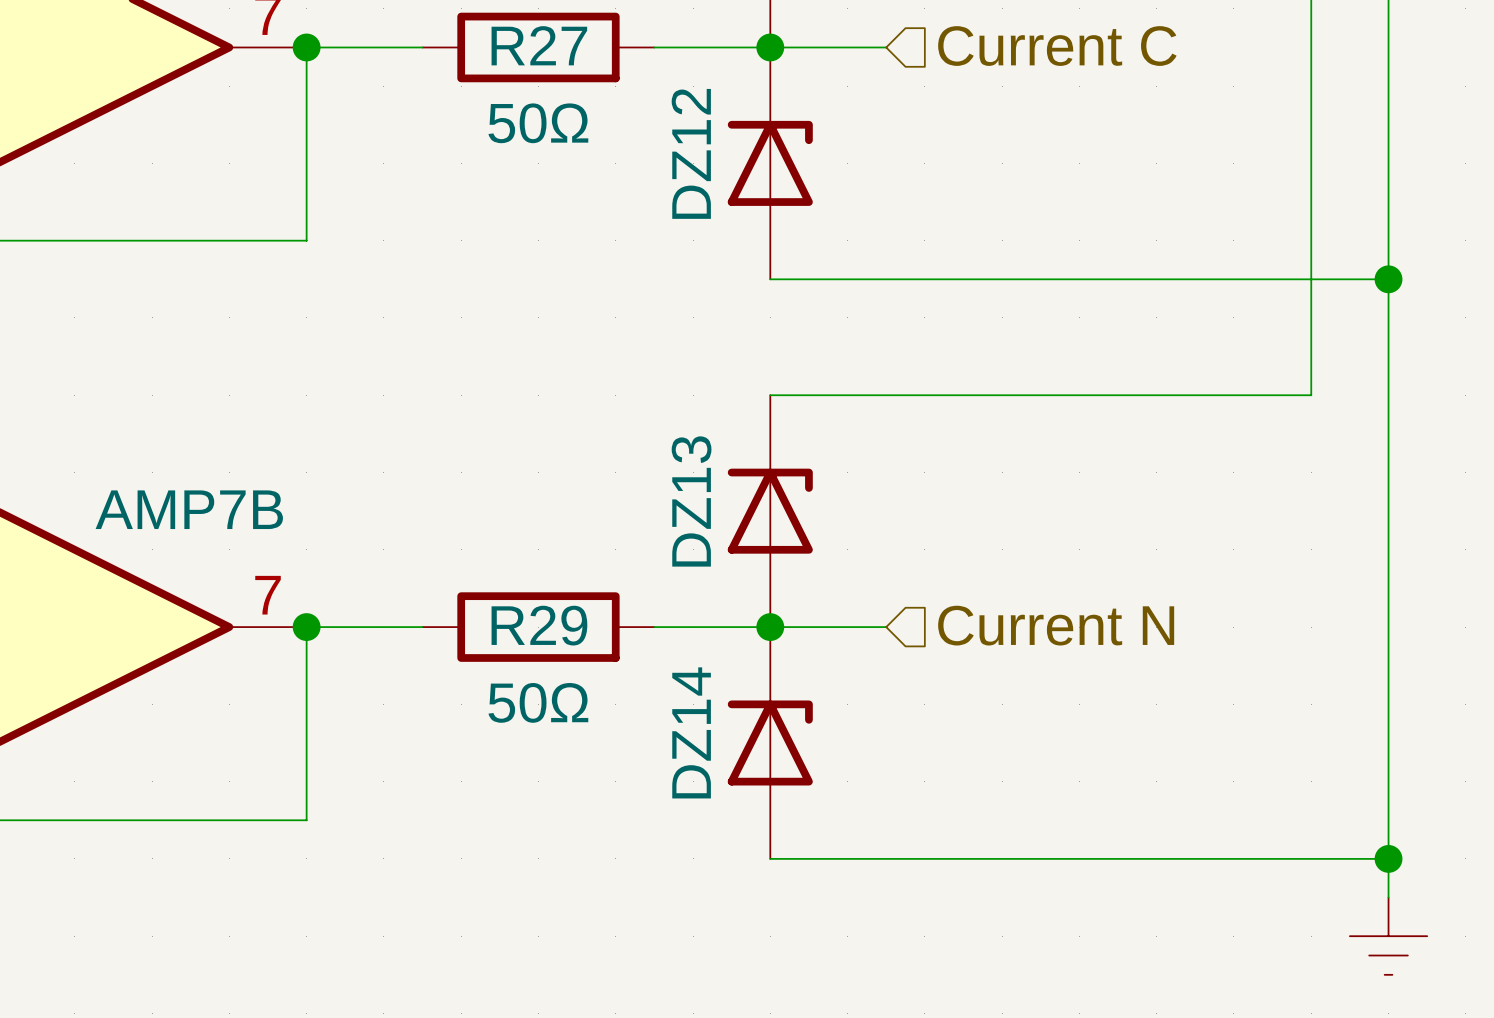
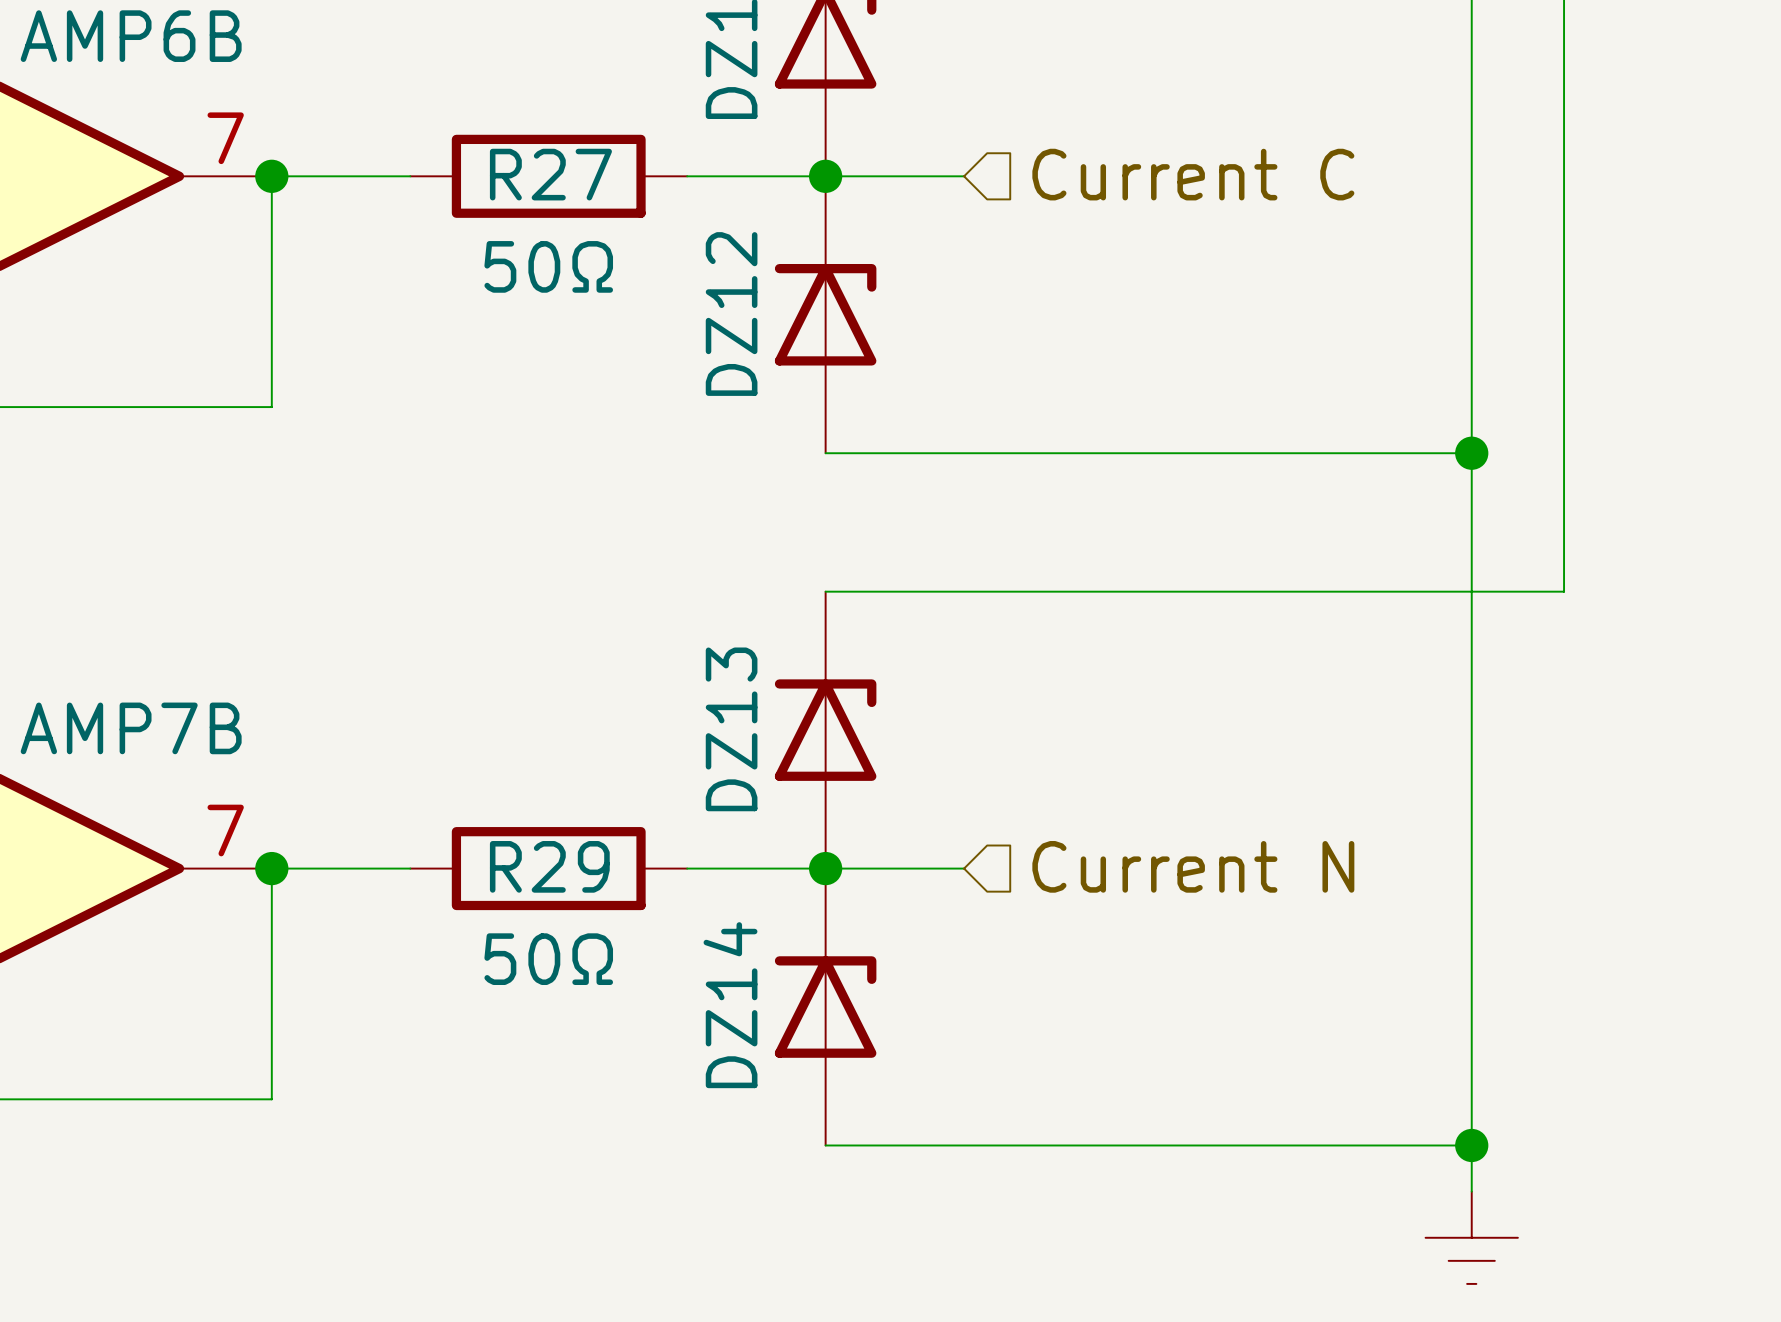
wire: (1311, 279) (1388, 279) -> none
junction position: (1388, 279) -> (1471, 453)
wire: (1388, 395) (1388, 897) -> (1564, 591) (1471, 591) (1471, 1191)
wire: (1311, 858) (1388, 858) -> none
junction position: (1388, 858) -> (1471, 1145)
power symbol position: (1388, 936) -> (1471, 1237)

